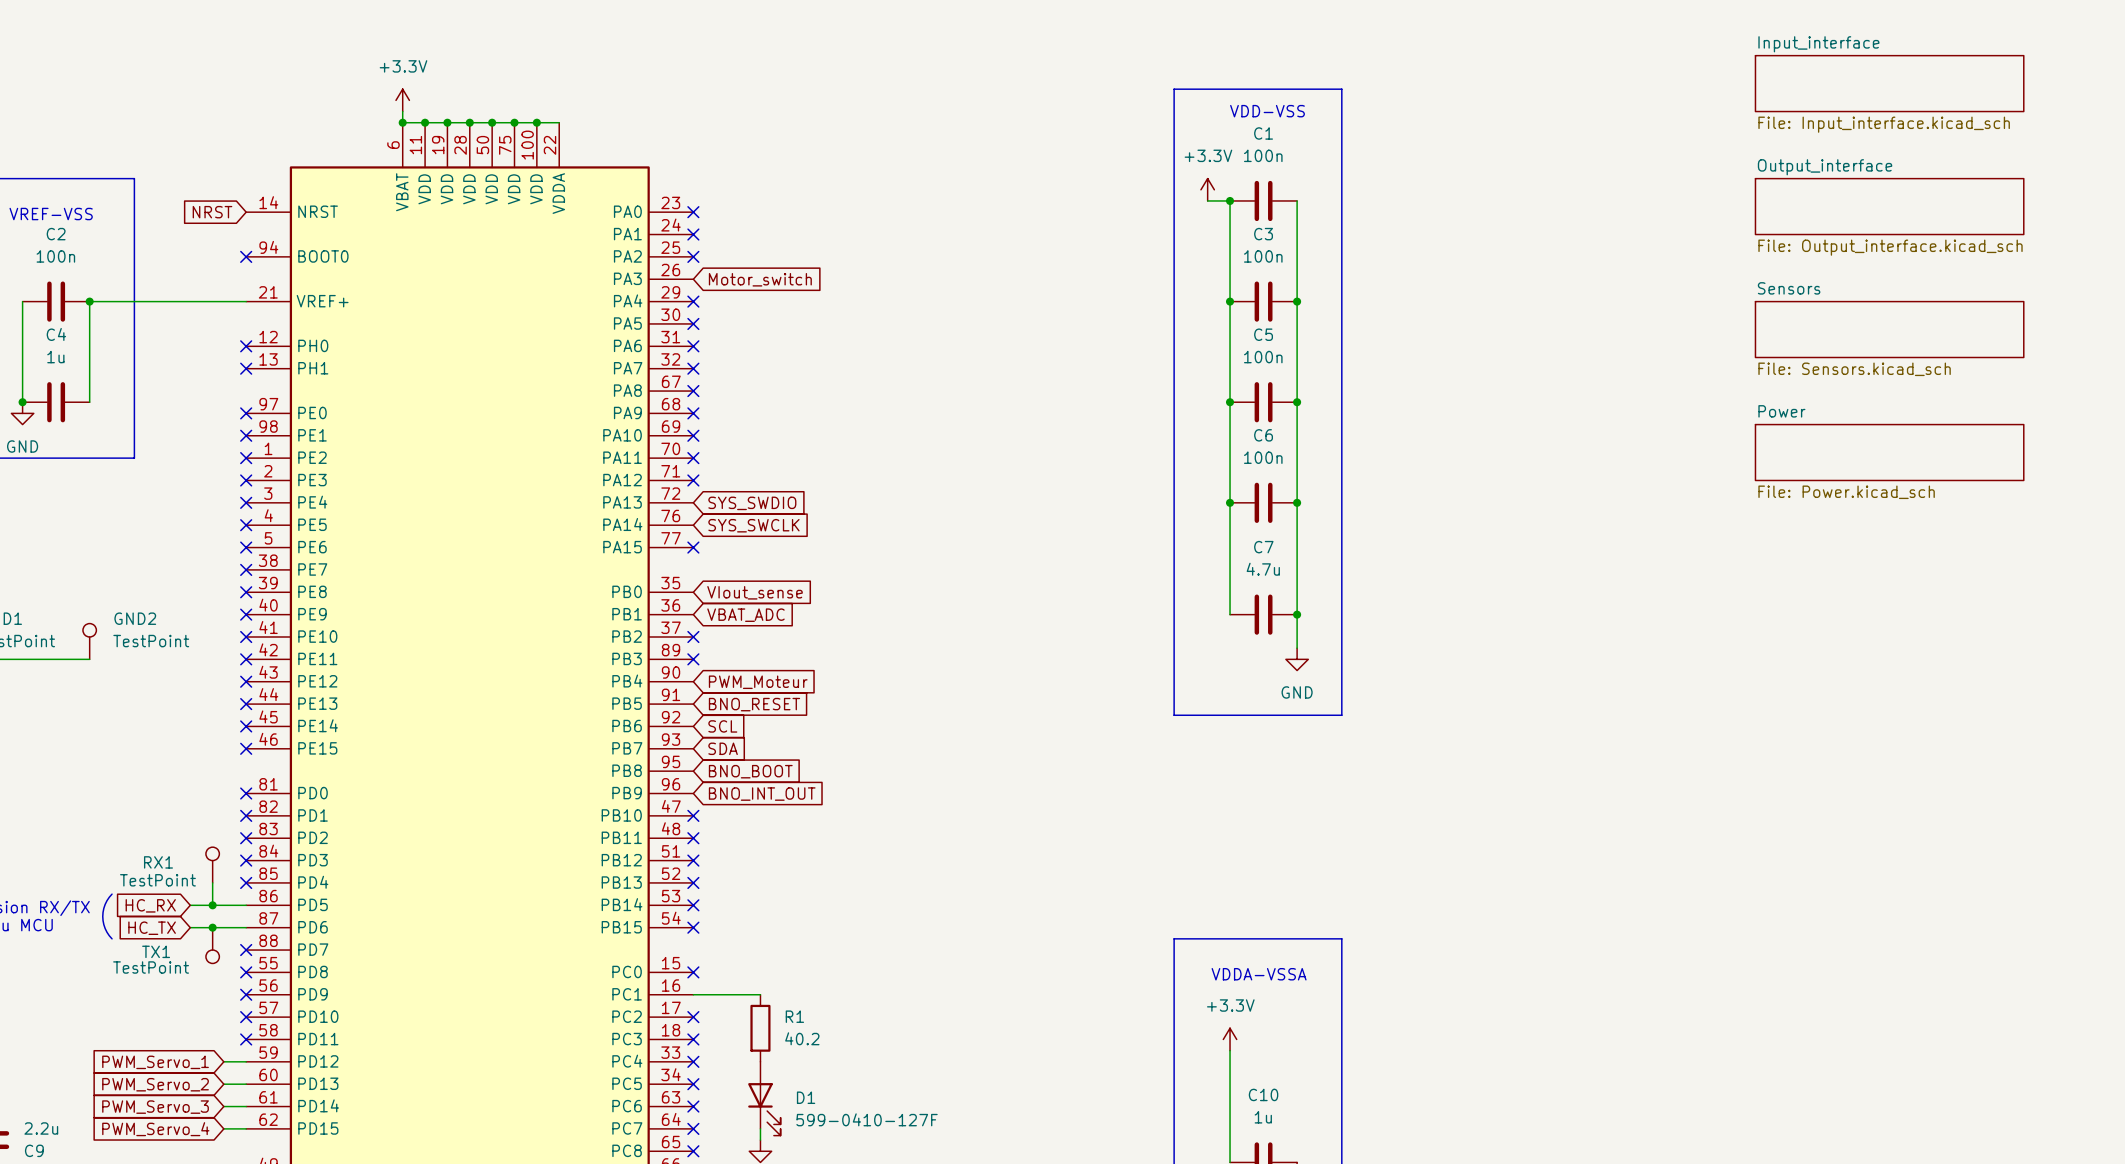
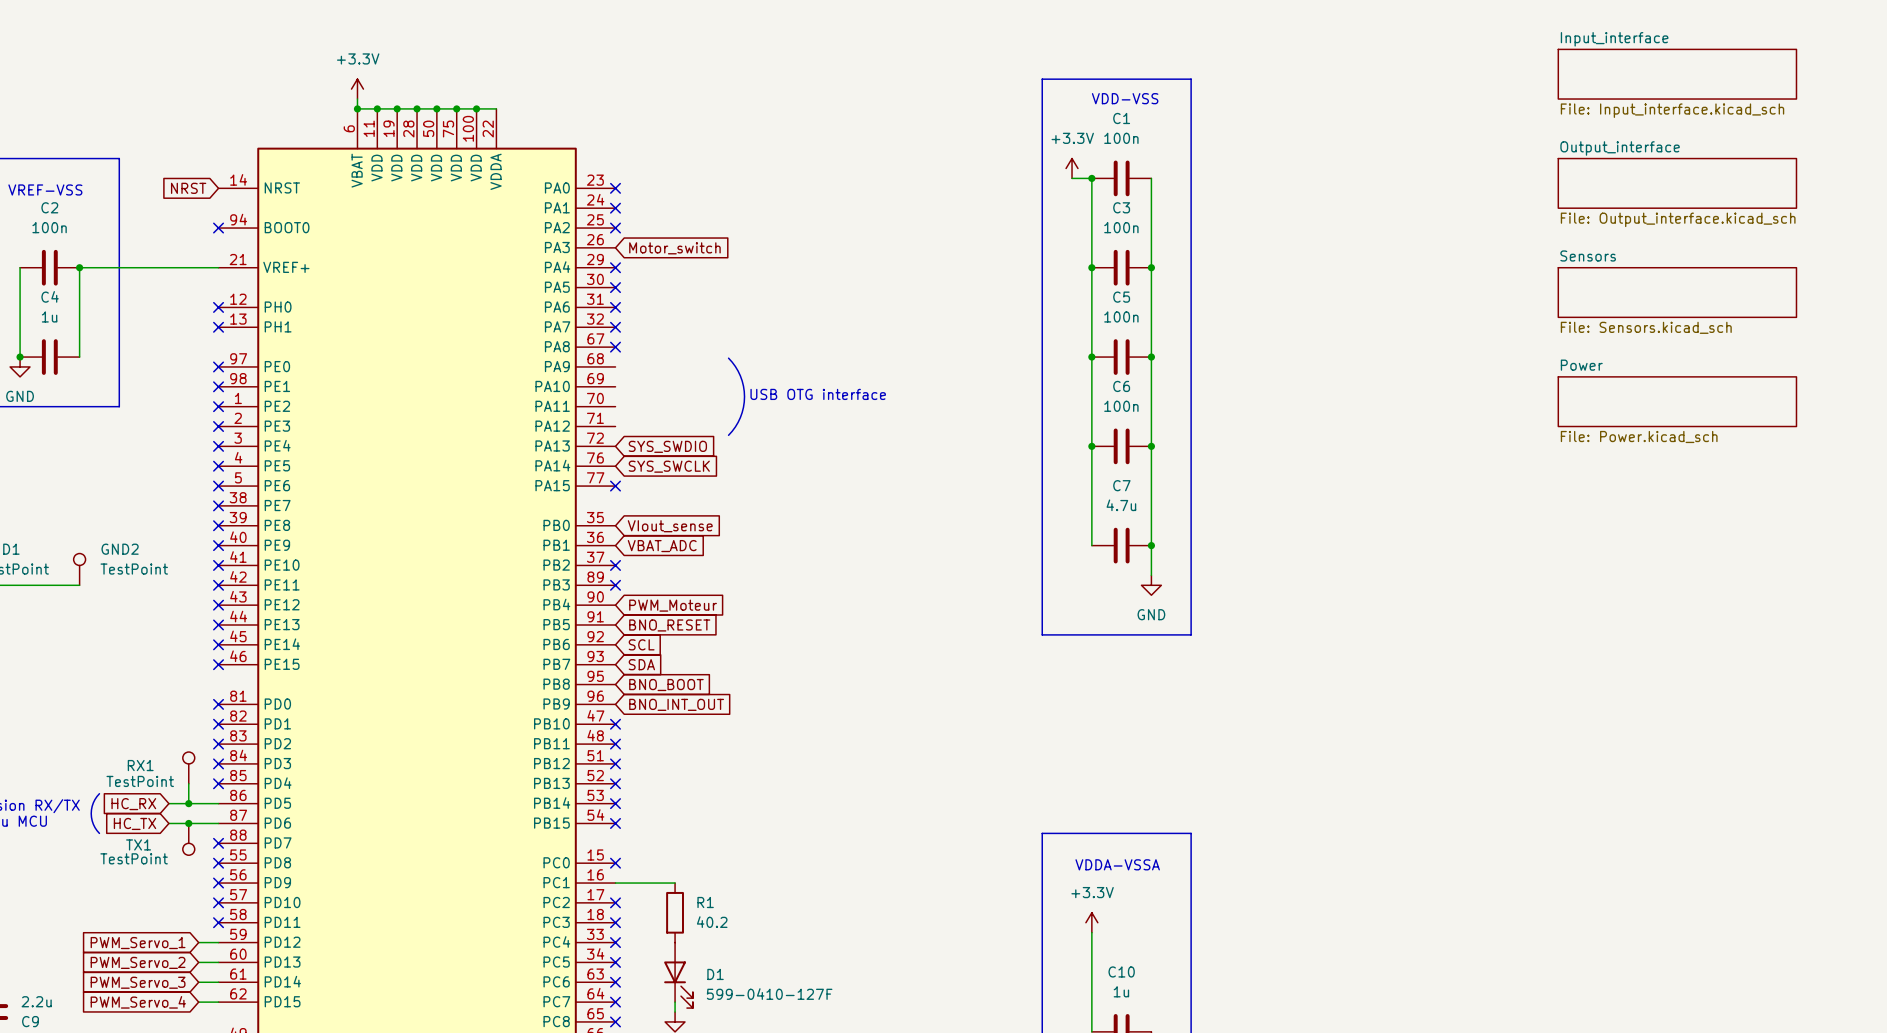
line: none -> (728, 358) (740, 375) (744, 396) (740, 417) (728, 435)
no-connect mark: (693, 413) -> none
no-connect mark: (693, 435) -> none
text: none -> USB OTG interface (818, 394)
no-connect mark: (693, 458) -> none
no-connect mark: (693, 480) -> none

